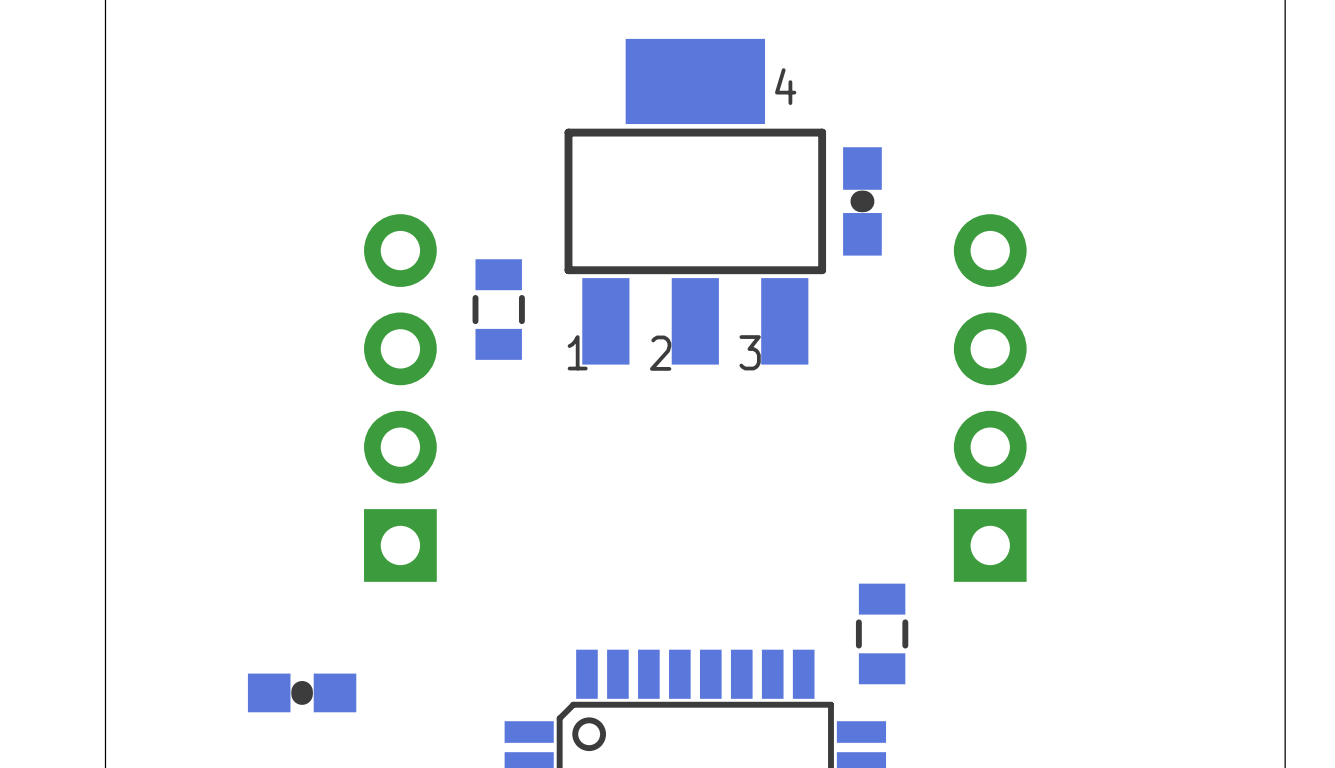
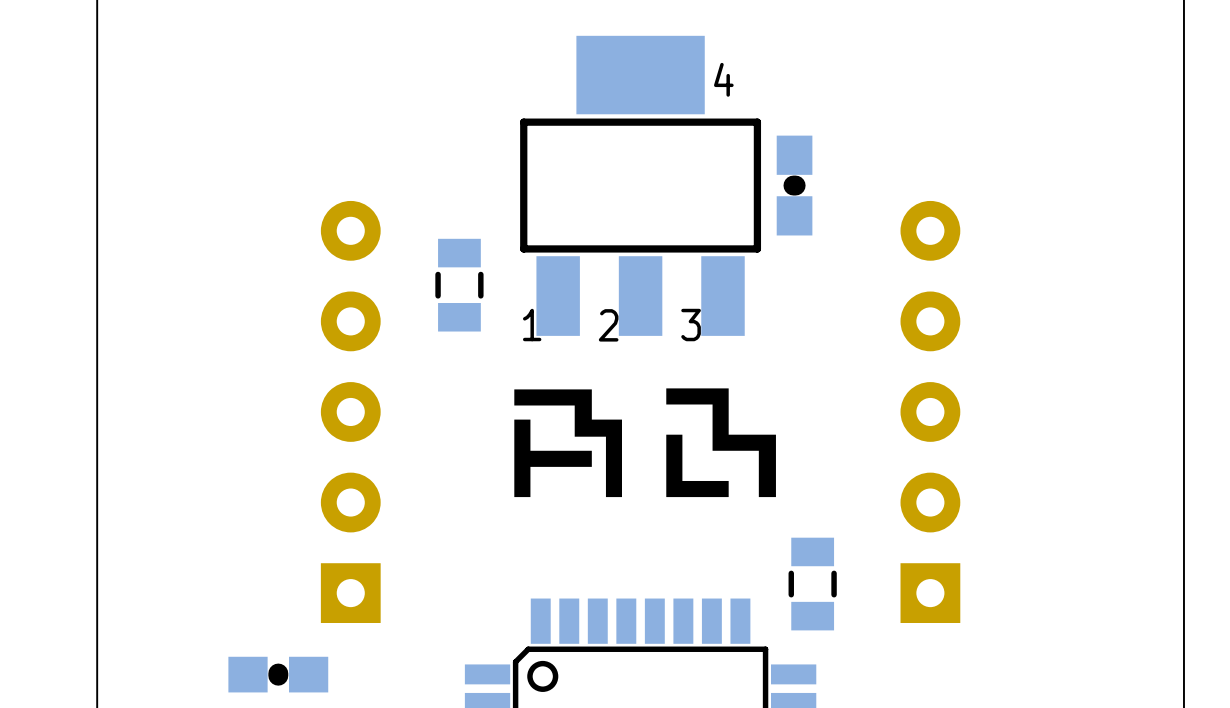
part: (400, 398) -> none
part: (990, 398) -> none
drawing: none -> [666, 388, 776, 498]
drawing: none -> [514, 389, 622, 498]
part: none -> (350, 411)
part: none -> (930, 411)
part position: (302, 692) -> (278, 674)

